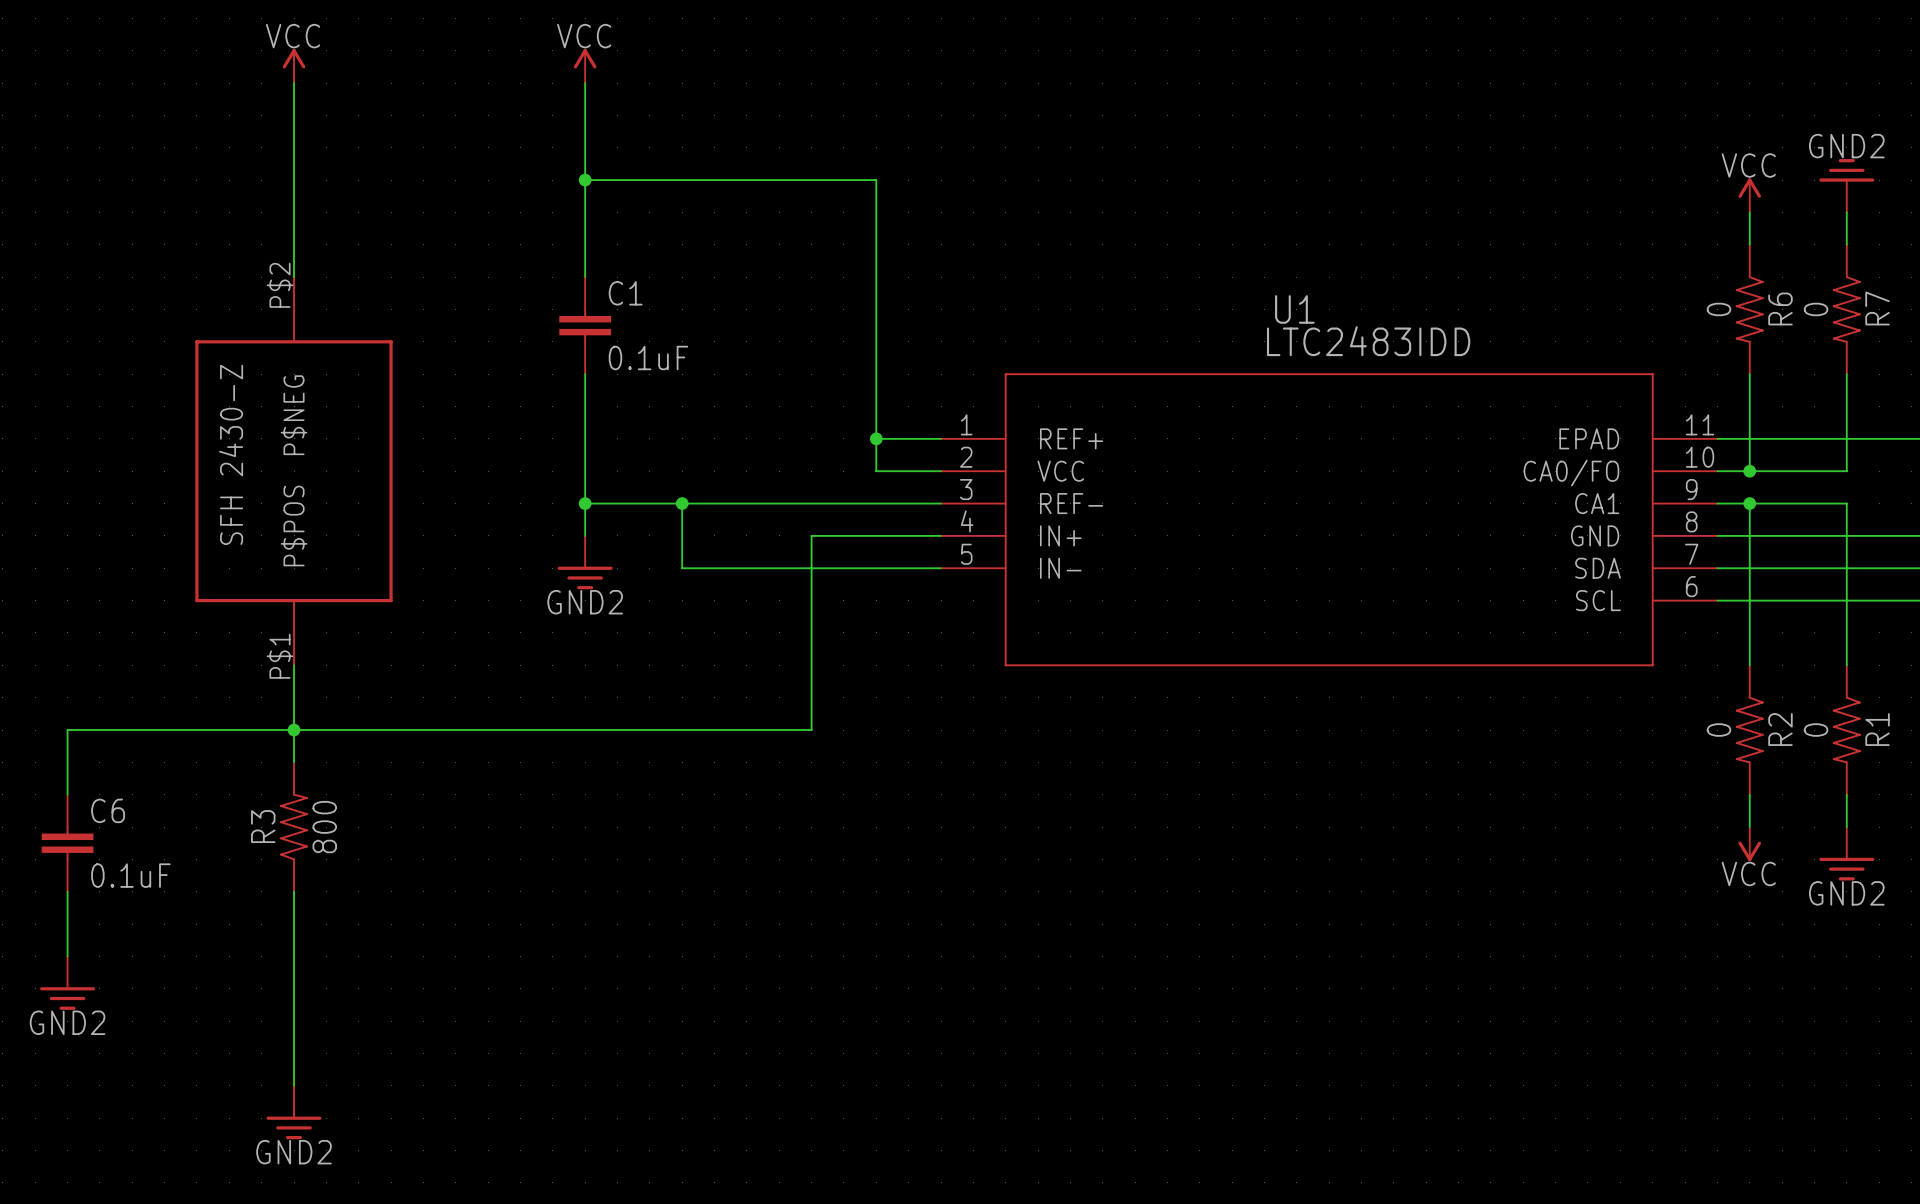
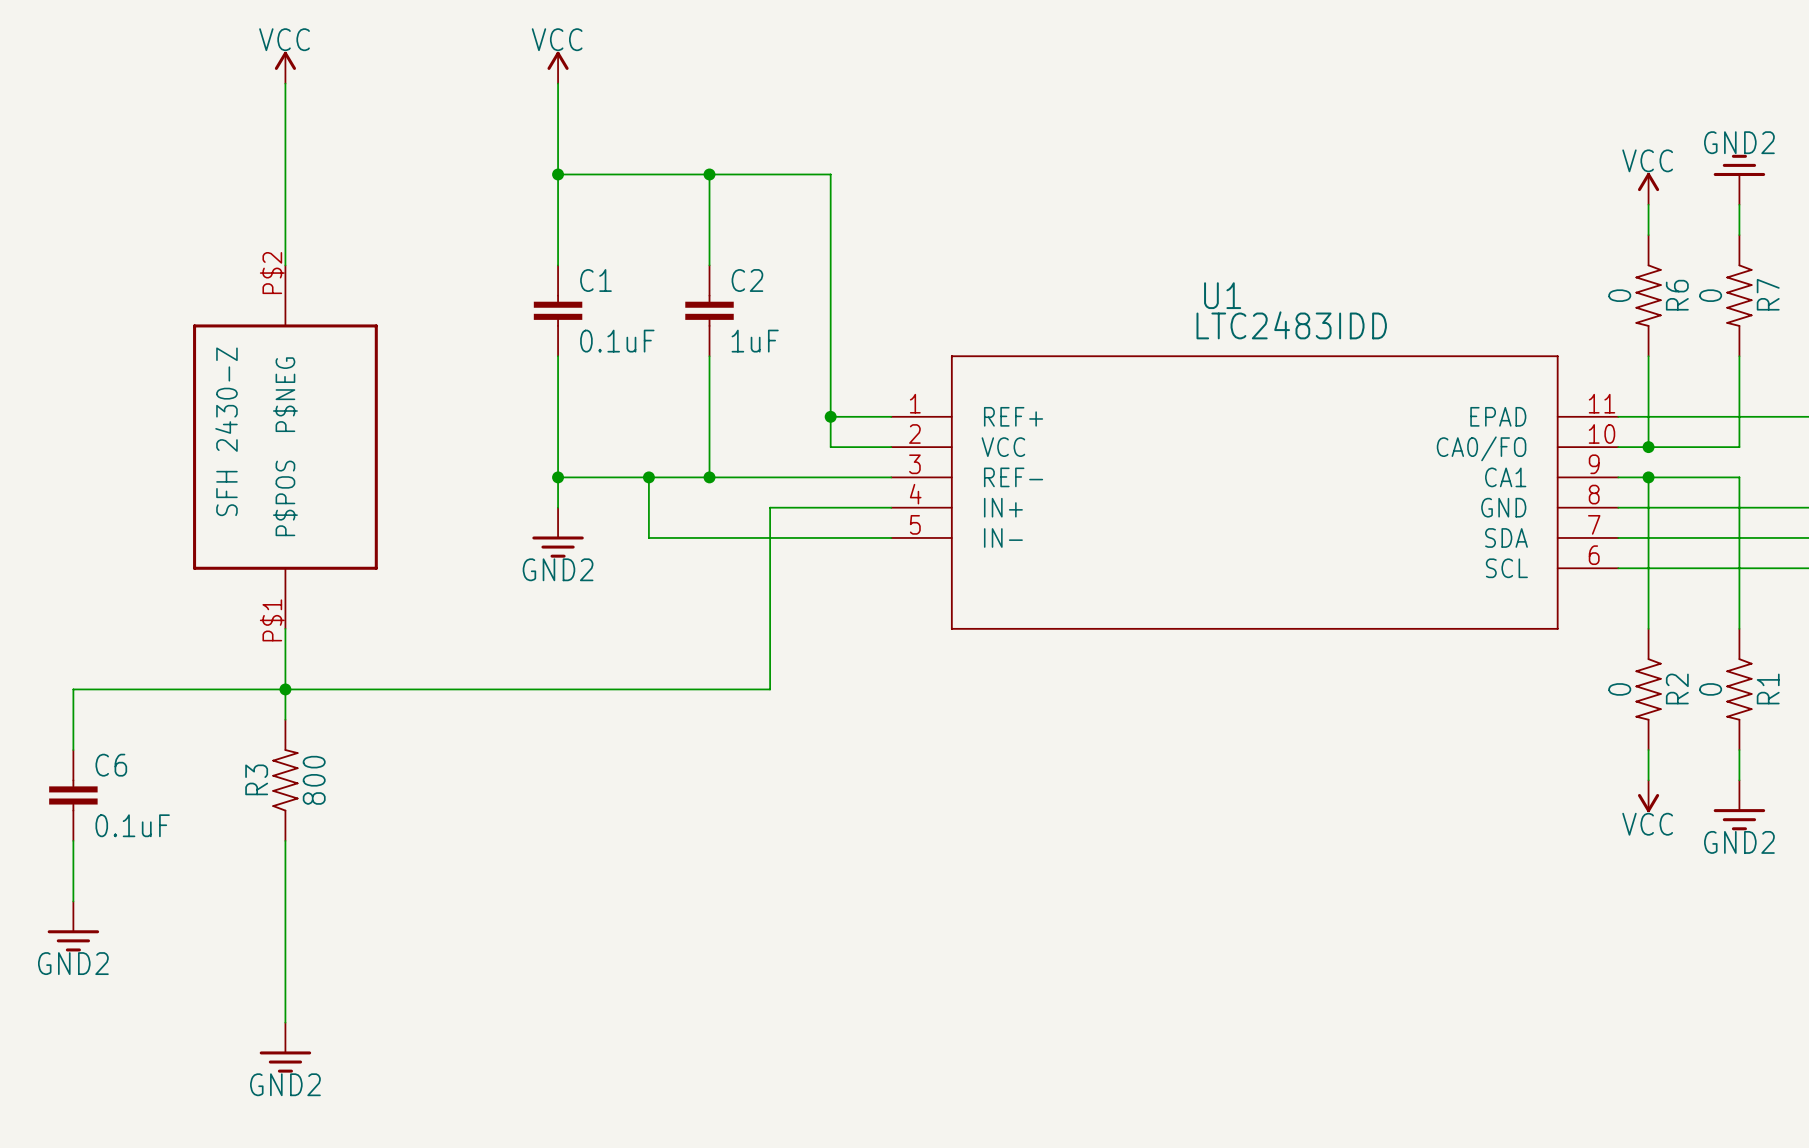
wire: none -> (709, 174) (709, 265)
junction: none -> (709, 174)
C2: none -> 1uF (709, 310)
wire: none -> (709, 356) (709, 477)
junction: none -> (709, 477)

